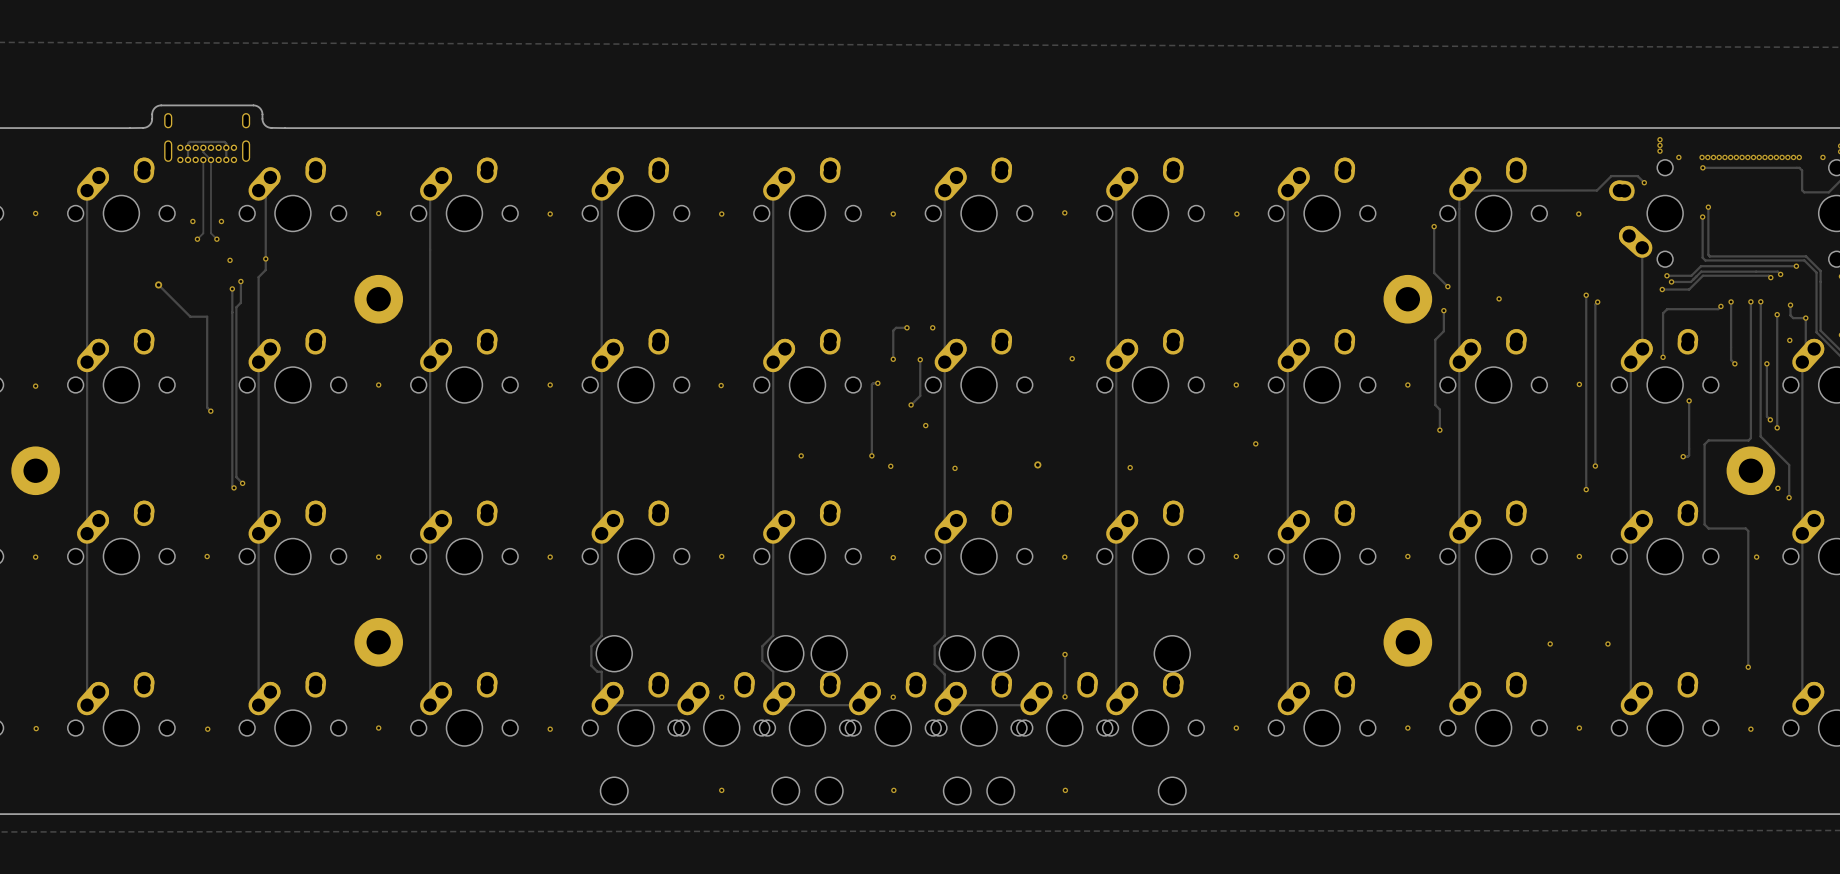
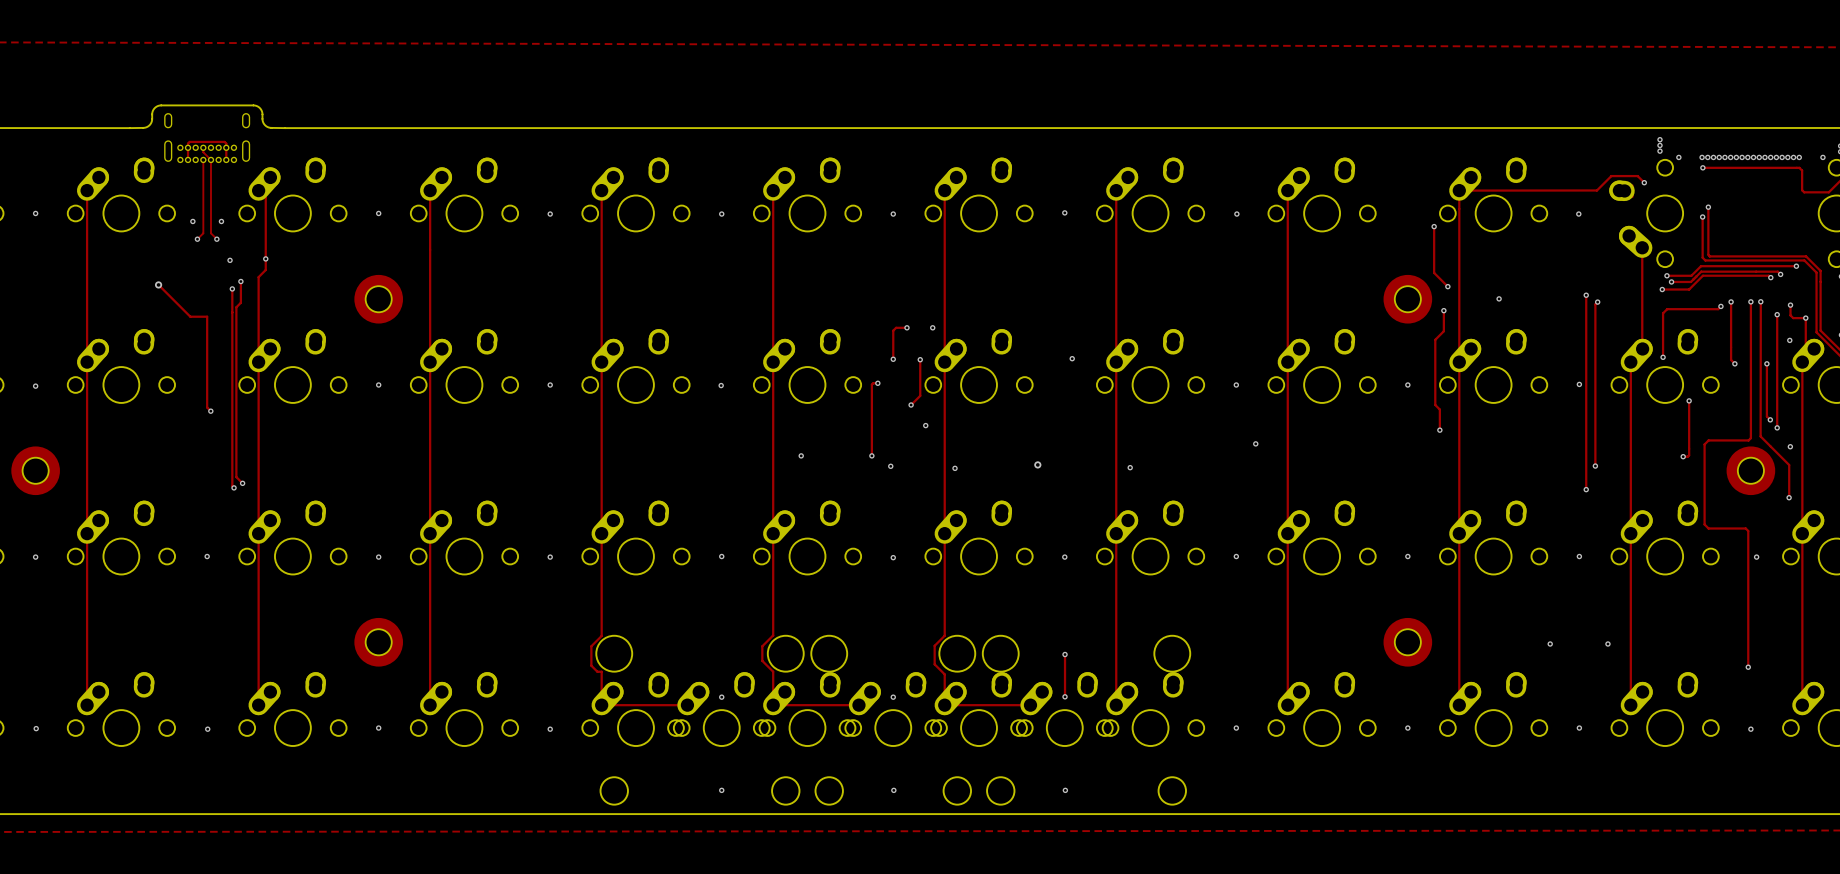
via position: (1777, 488) -> (1790, 446)

